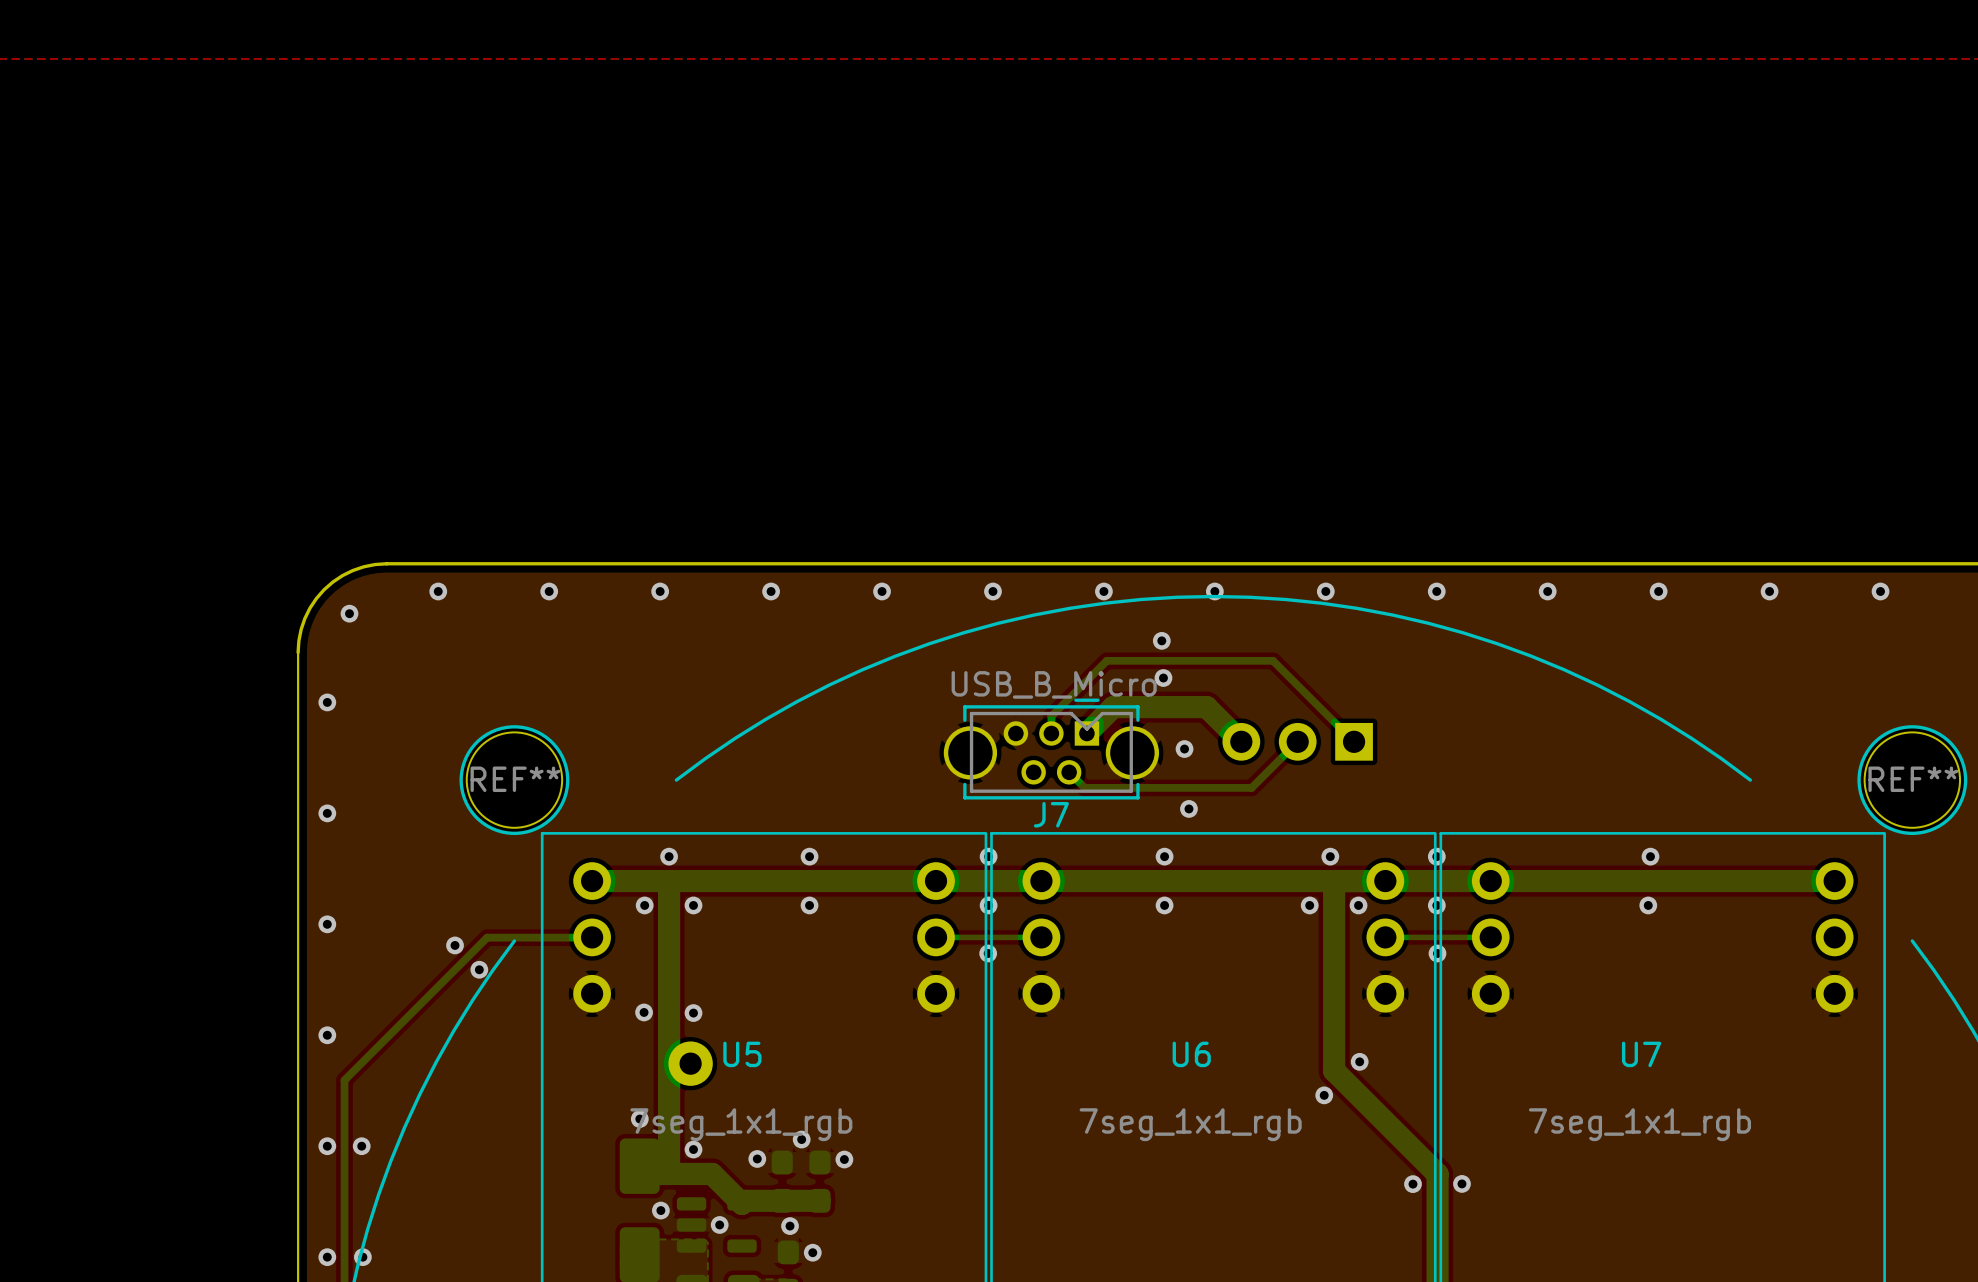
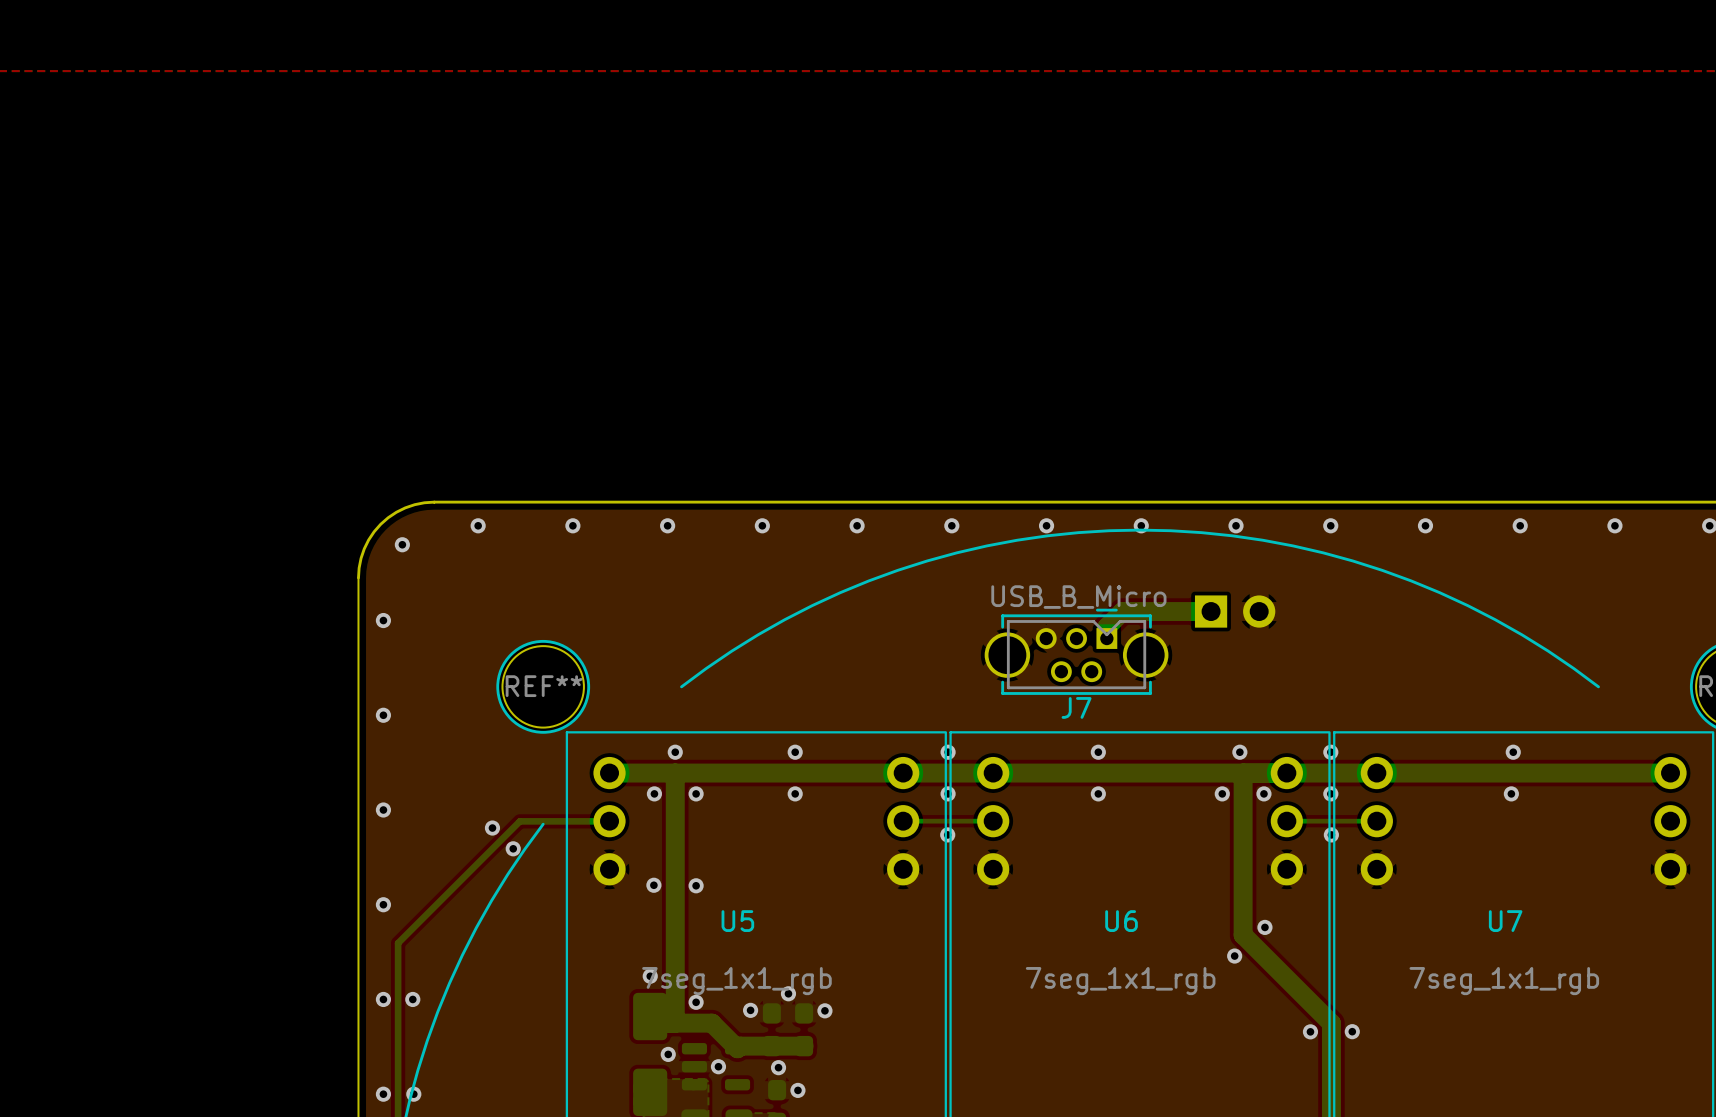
via: (1161, 640) -> none
via: (1163, 678) -> none
bottom track: none -> (1211, 611) (1122, 611) (1106, 627) (1106, 638)
part: none -> (1235, 611)
bottom track: (1051, 733) (1051, 716) (1106, 660) (1273, 660) (1354, 741) -> none
bottom track: (1086, 733) (1113, 707) (1206, 707) (1241, 741) -> none
bottom track: (1297, 741) (1251, 787) (1084, 787) (1069, 772) -> none
part: (1297, 741) -> none
J7 position: (1051, 749) -> (1076, 651)
via: (1184, 749) -> none
via: (1188, 808) -> none
part: (690, 1063) -> none

